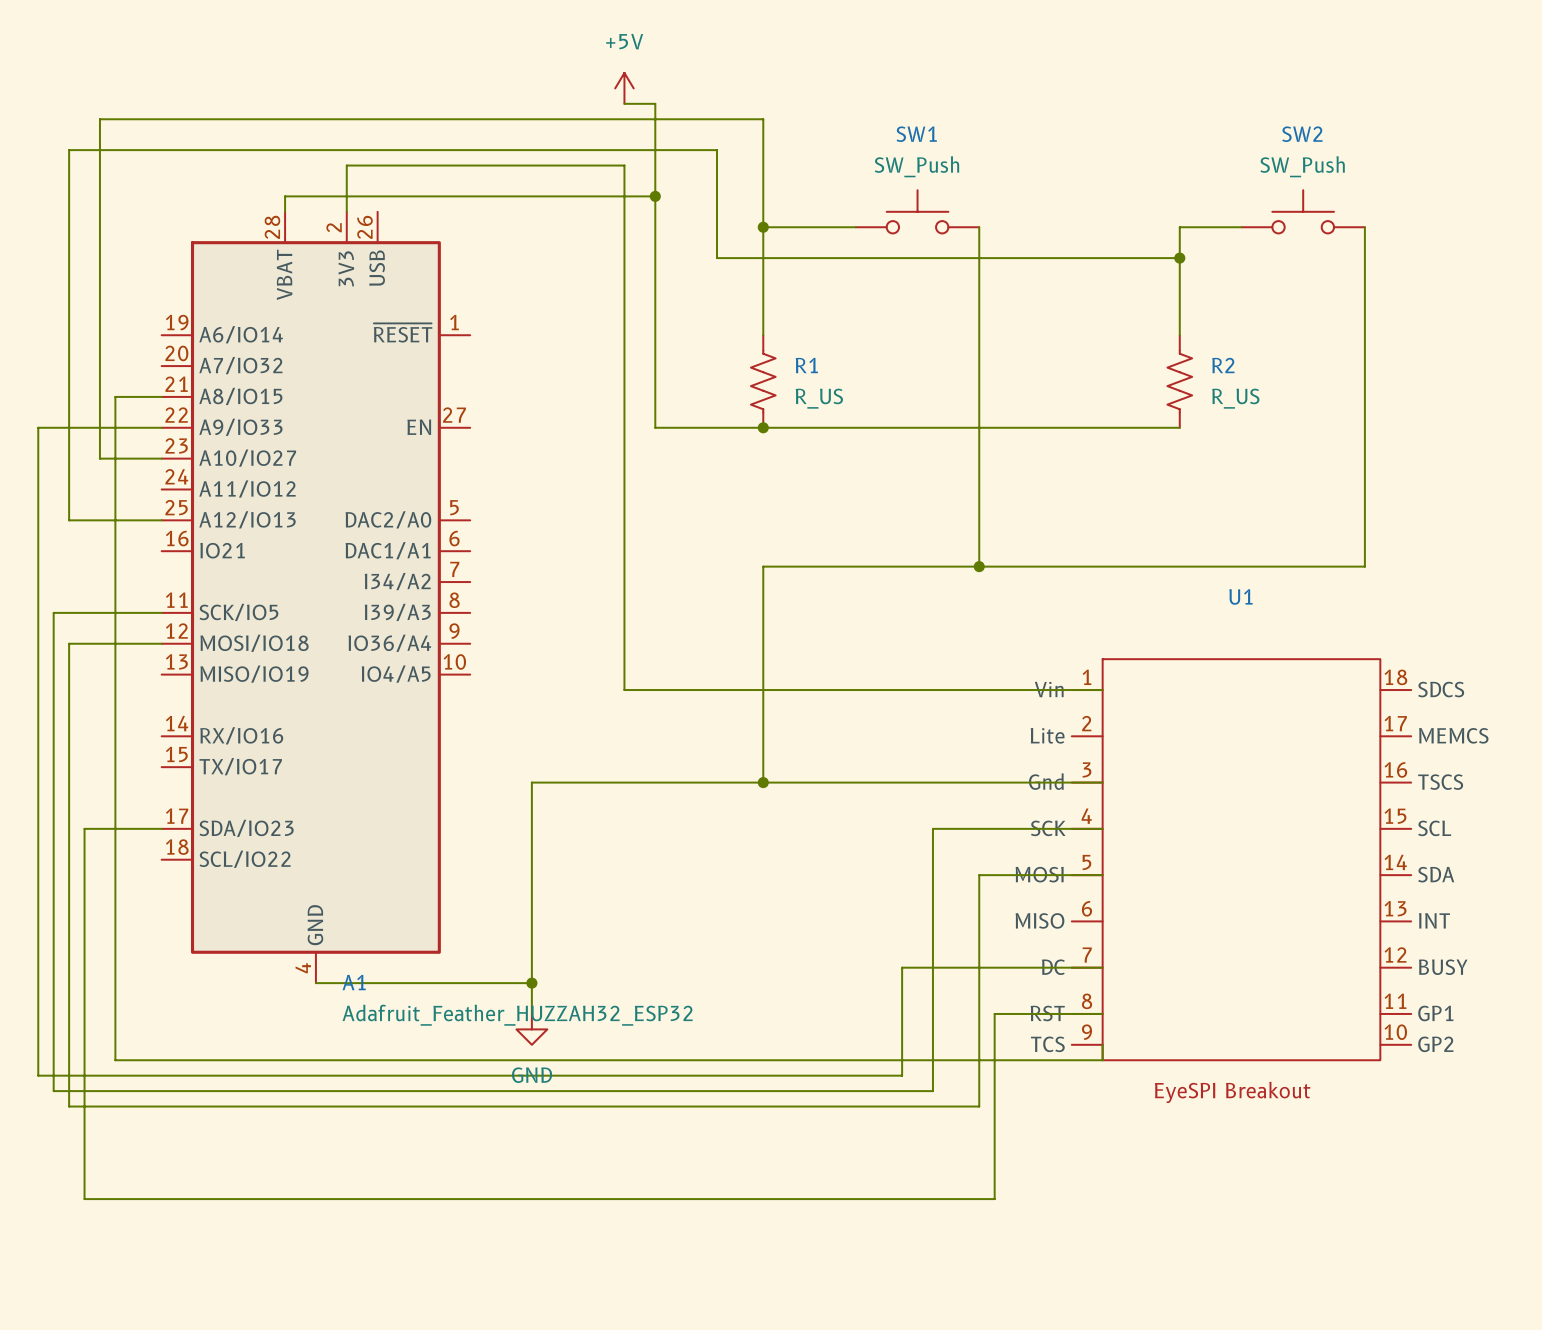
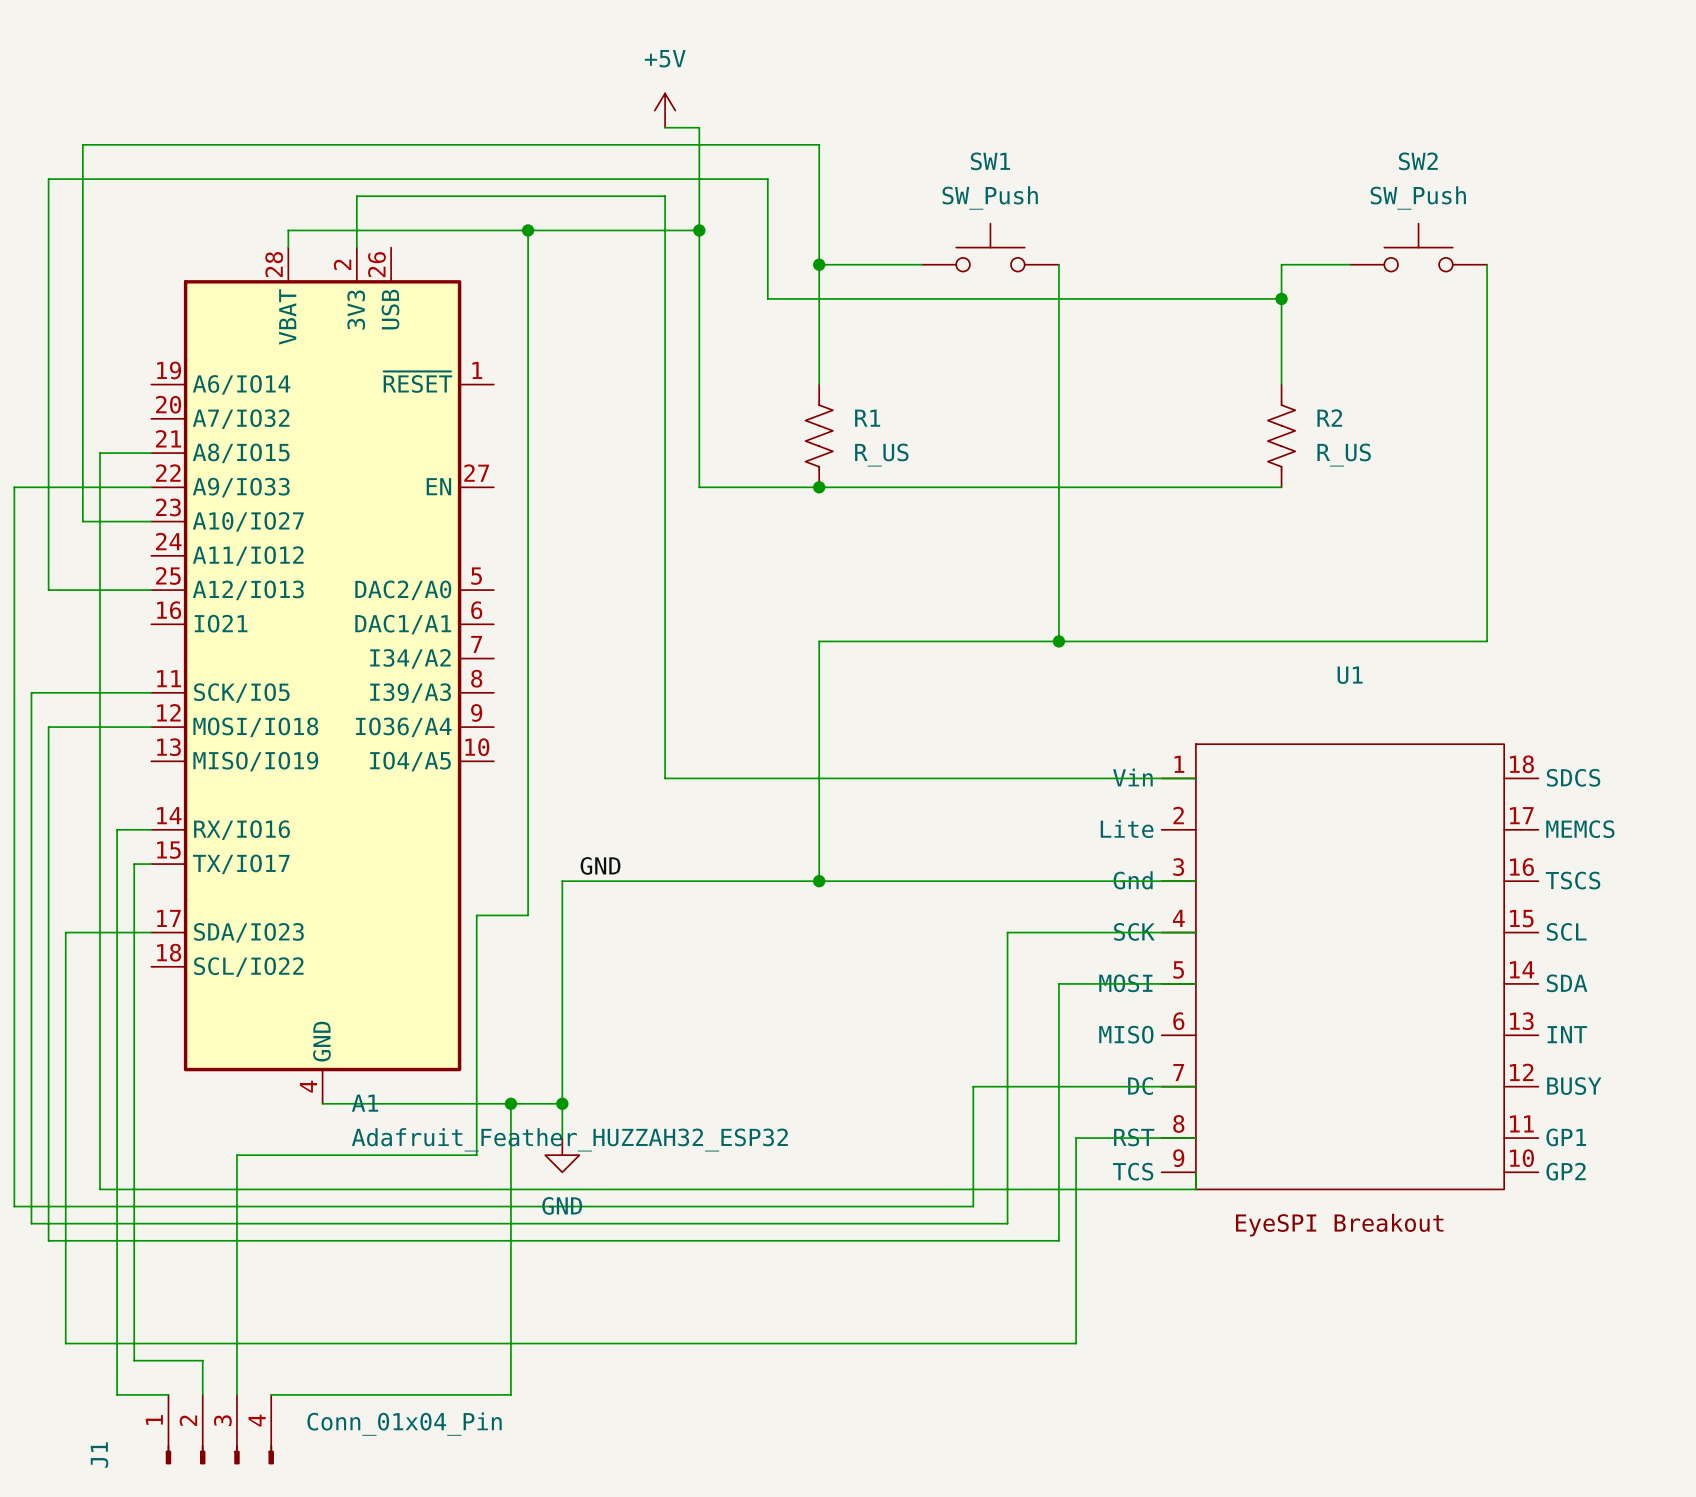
wire: none -> (528, 230) (528, 915) (476, 915) (476, 1155) (236, 1155) (236, 1394)
junction: none -> (528, 230)
wire: none -> (151, 829) (117, 829) (117, 1394) (168, 1394)
wire: none -> (151, 864) (134, 864) (134, 1360) (202, 1360) (202, 1394)
label: none -> GND (600, 865)
wire: none -> (510, 1103) (510, 1394) (271, 1394)
junction: none -> (510, 1103)
J1: none -> Conn_01x04_Pin (219, 1429)

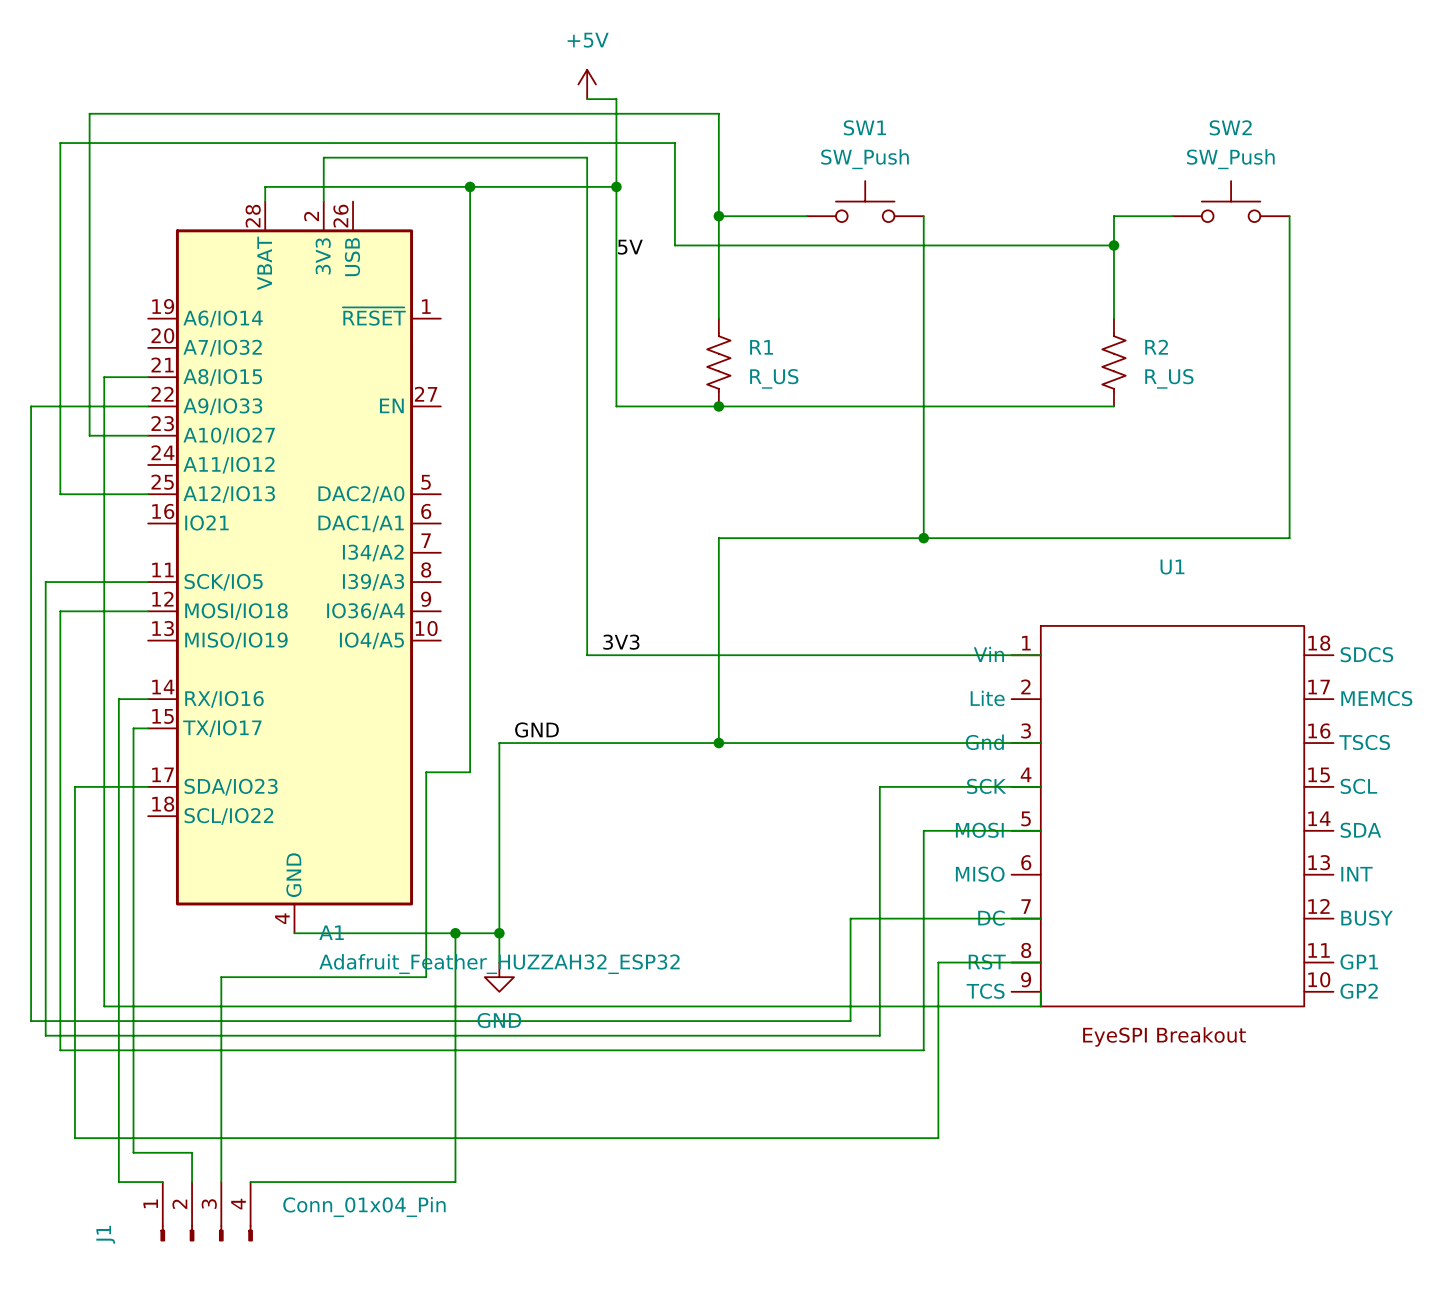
label: none -> 5V (630, 247)
label: none -> 3V3 (621, 642)

